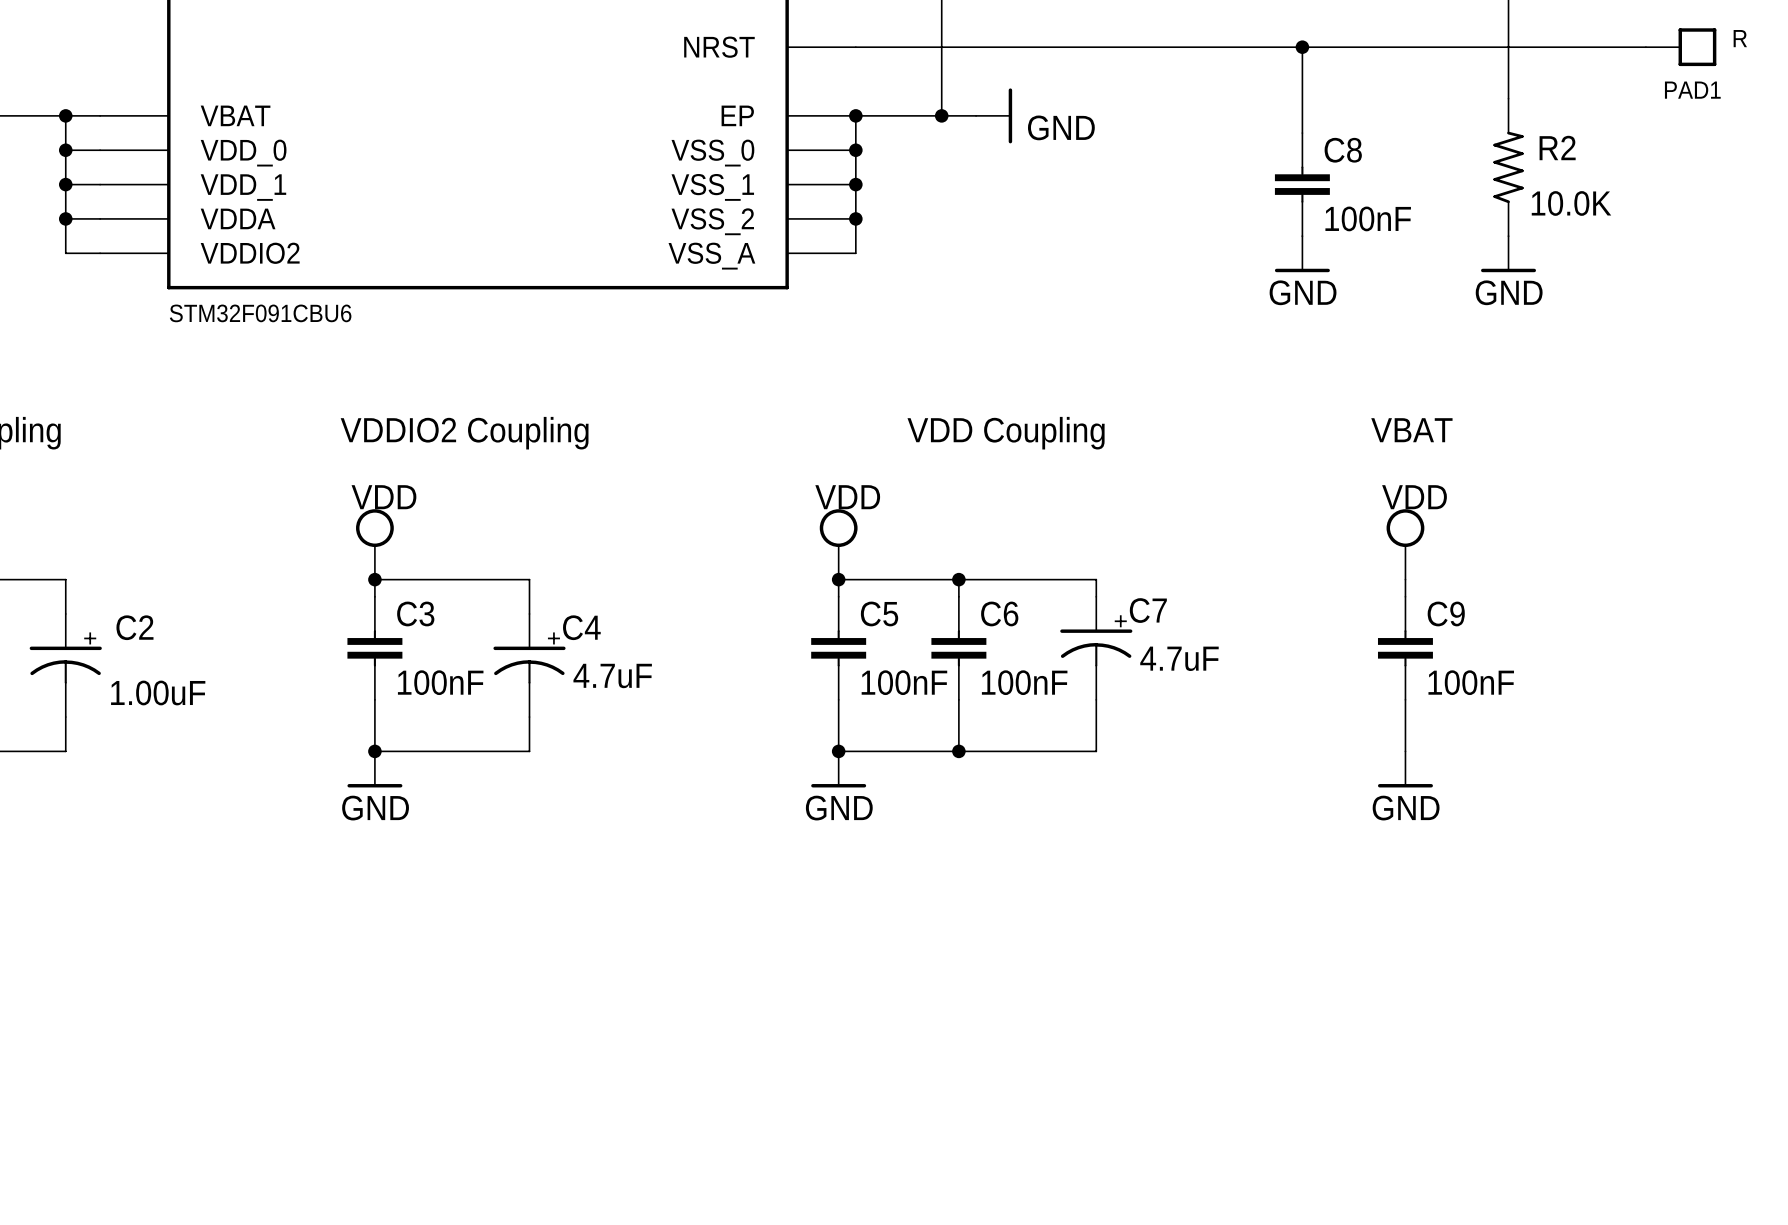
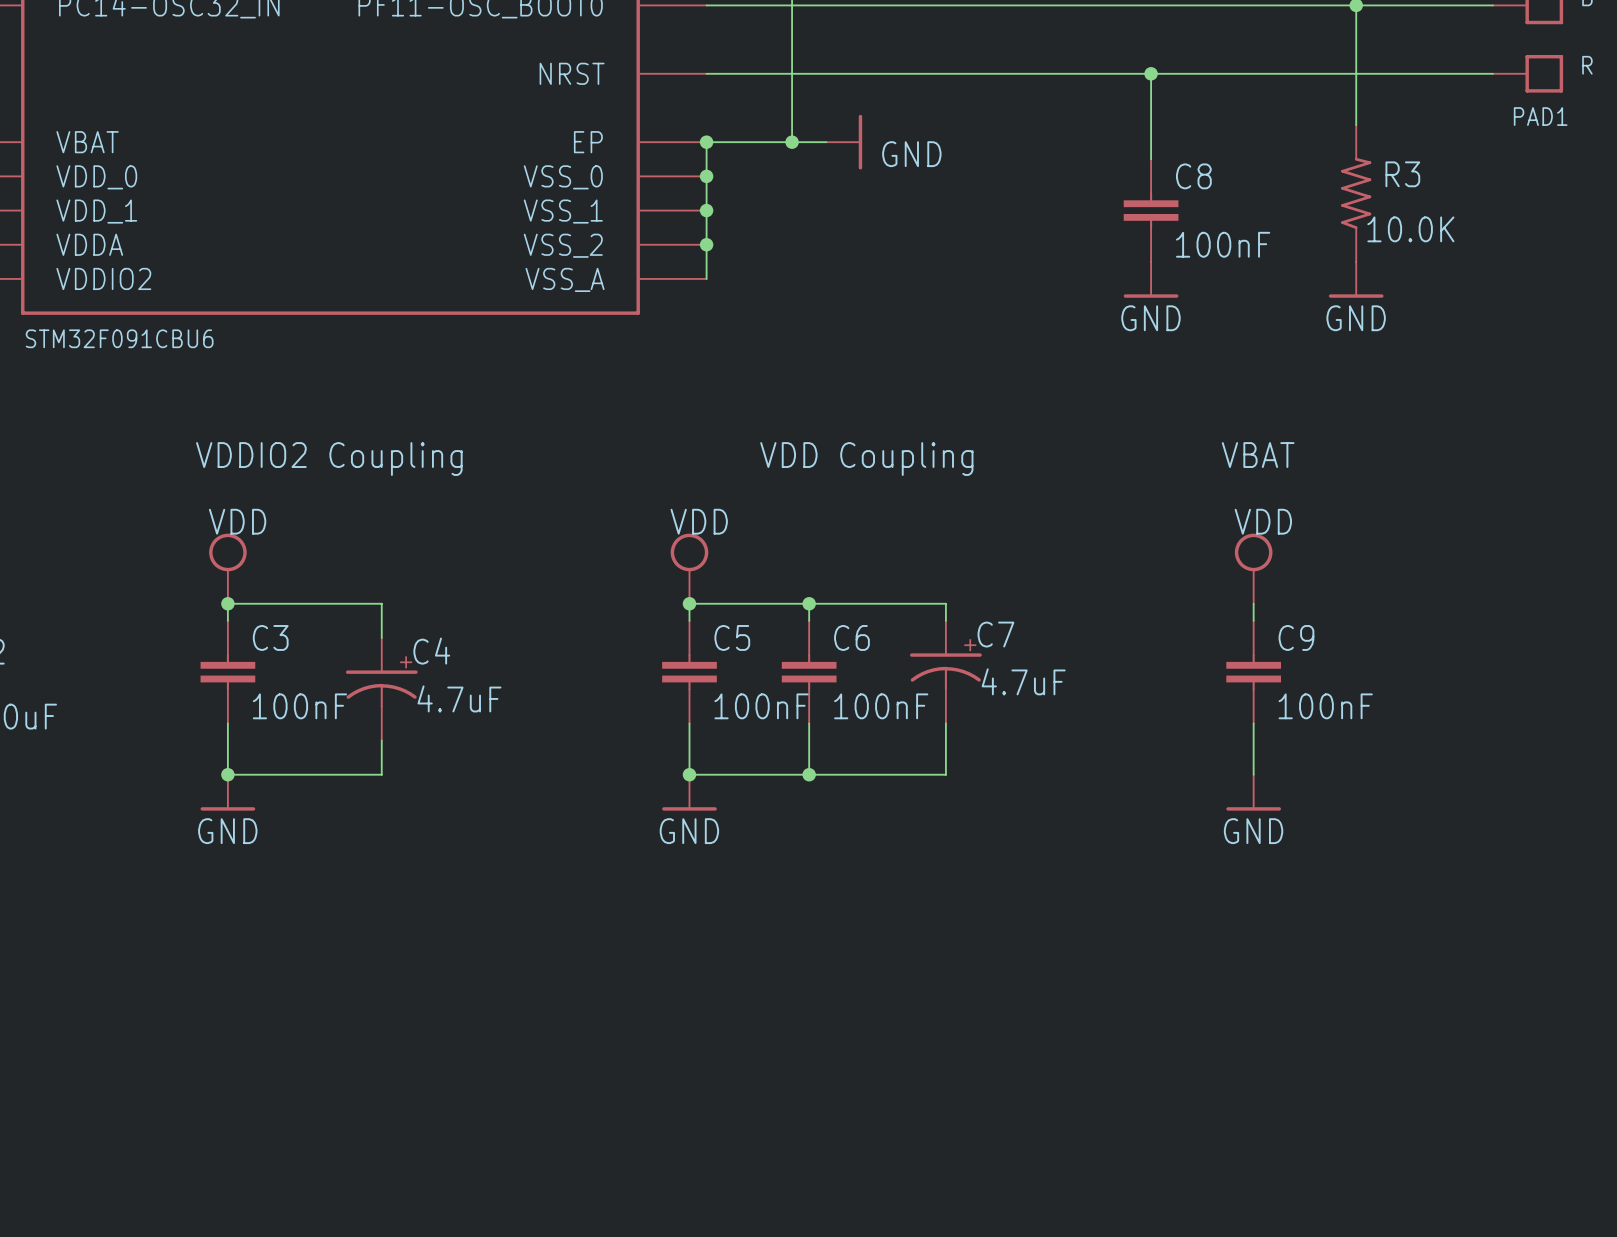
R2 name: R2 (1557, 148) -> R3 (1402, 174)

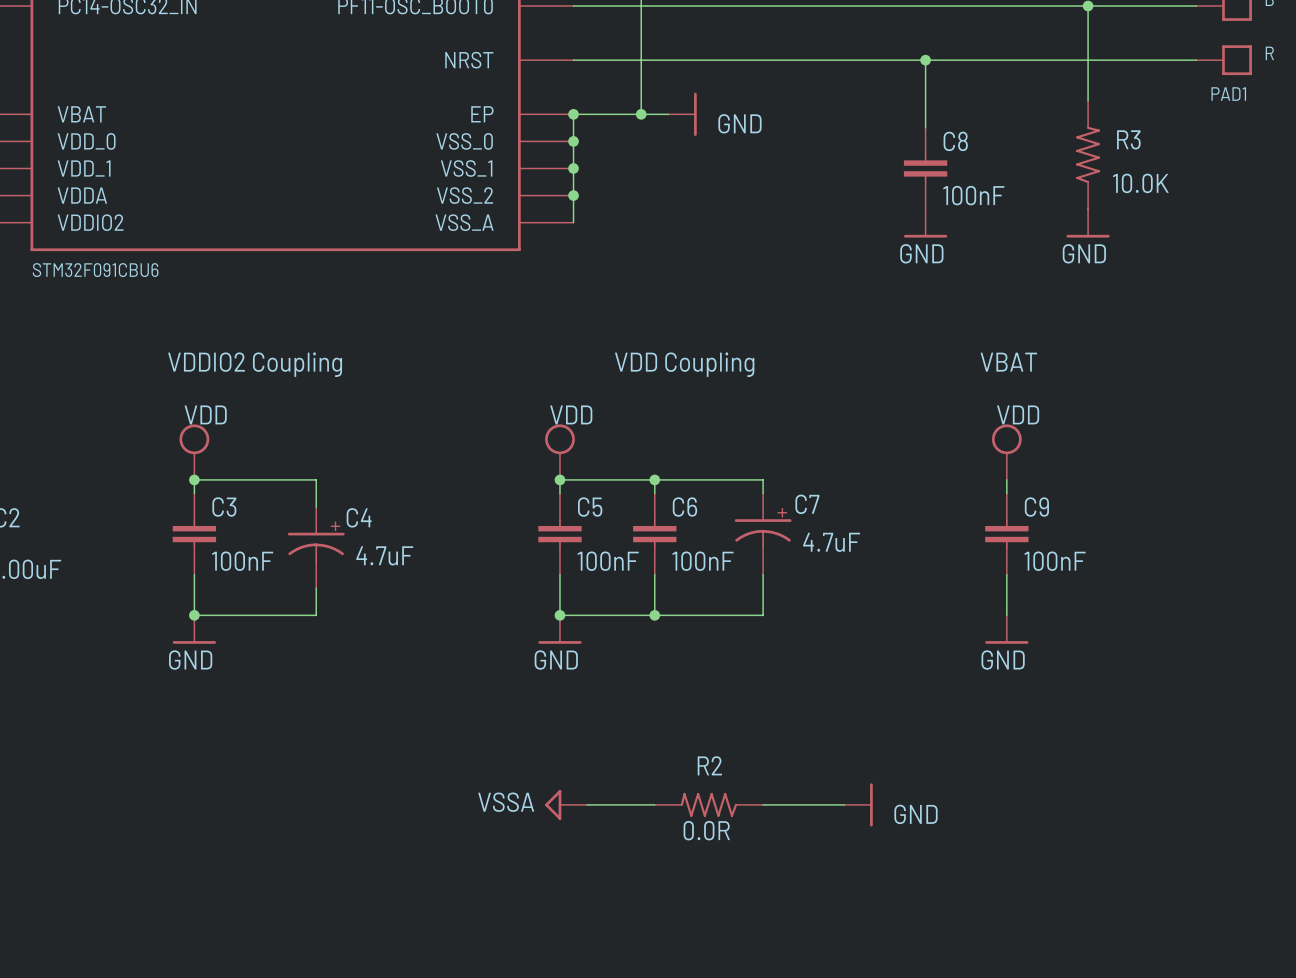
power symbol: none -> VSSA (566, 804)
wire: none -> (587, 804) (654, 804)
R2: none -> 0.0R (708, 804)
wire: none -> (763, 804) (844, 804)
power symbol: none -> GND (858, 804)

